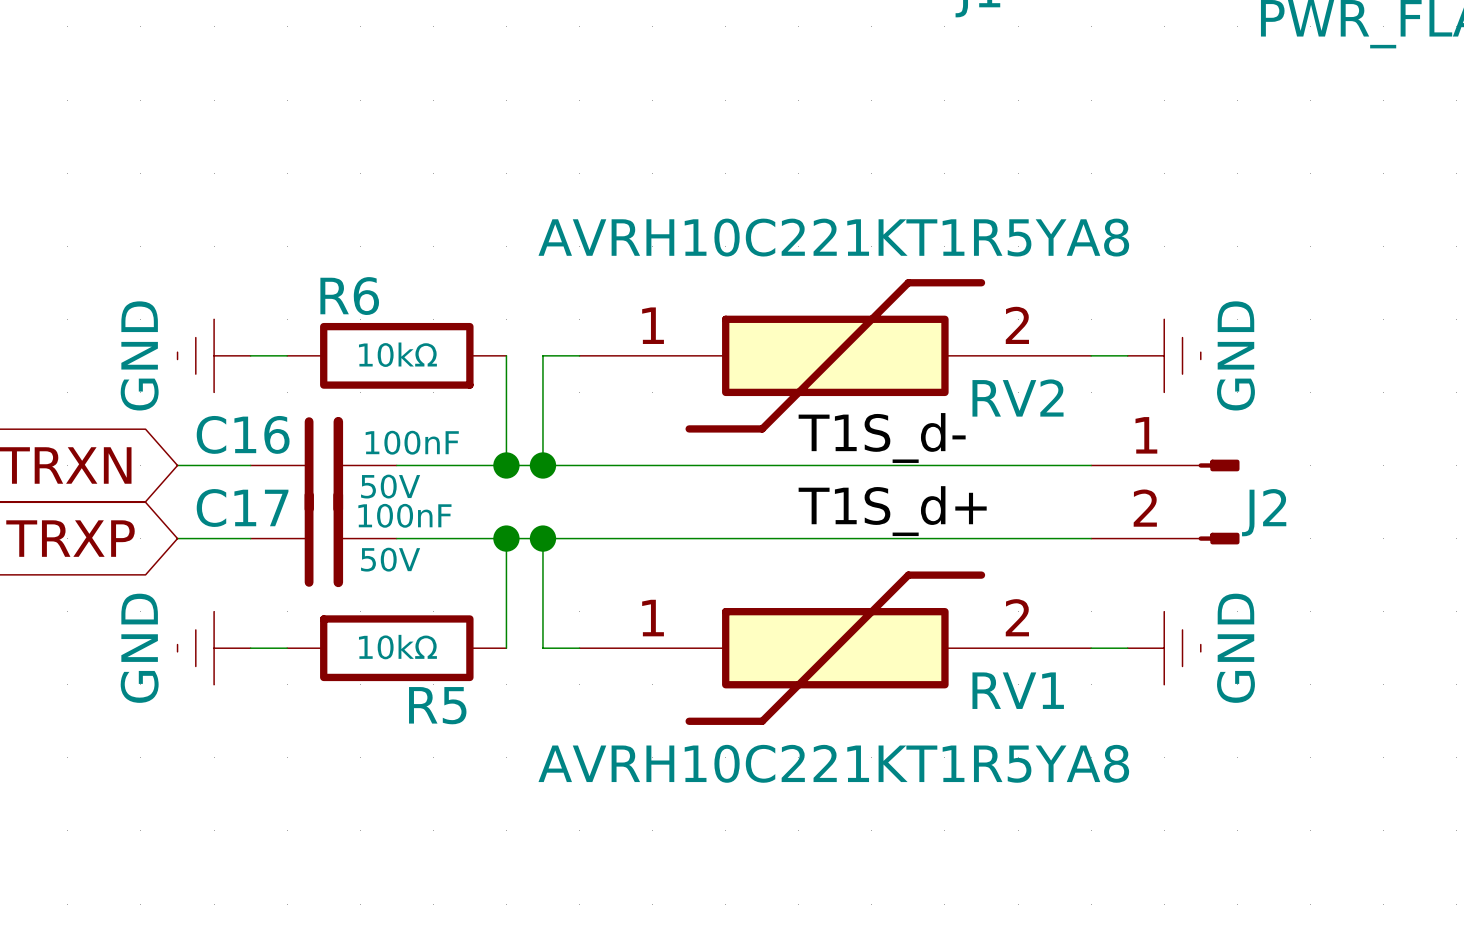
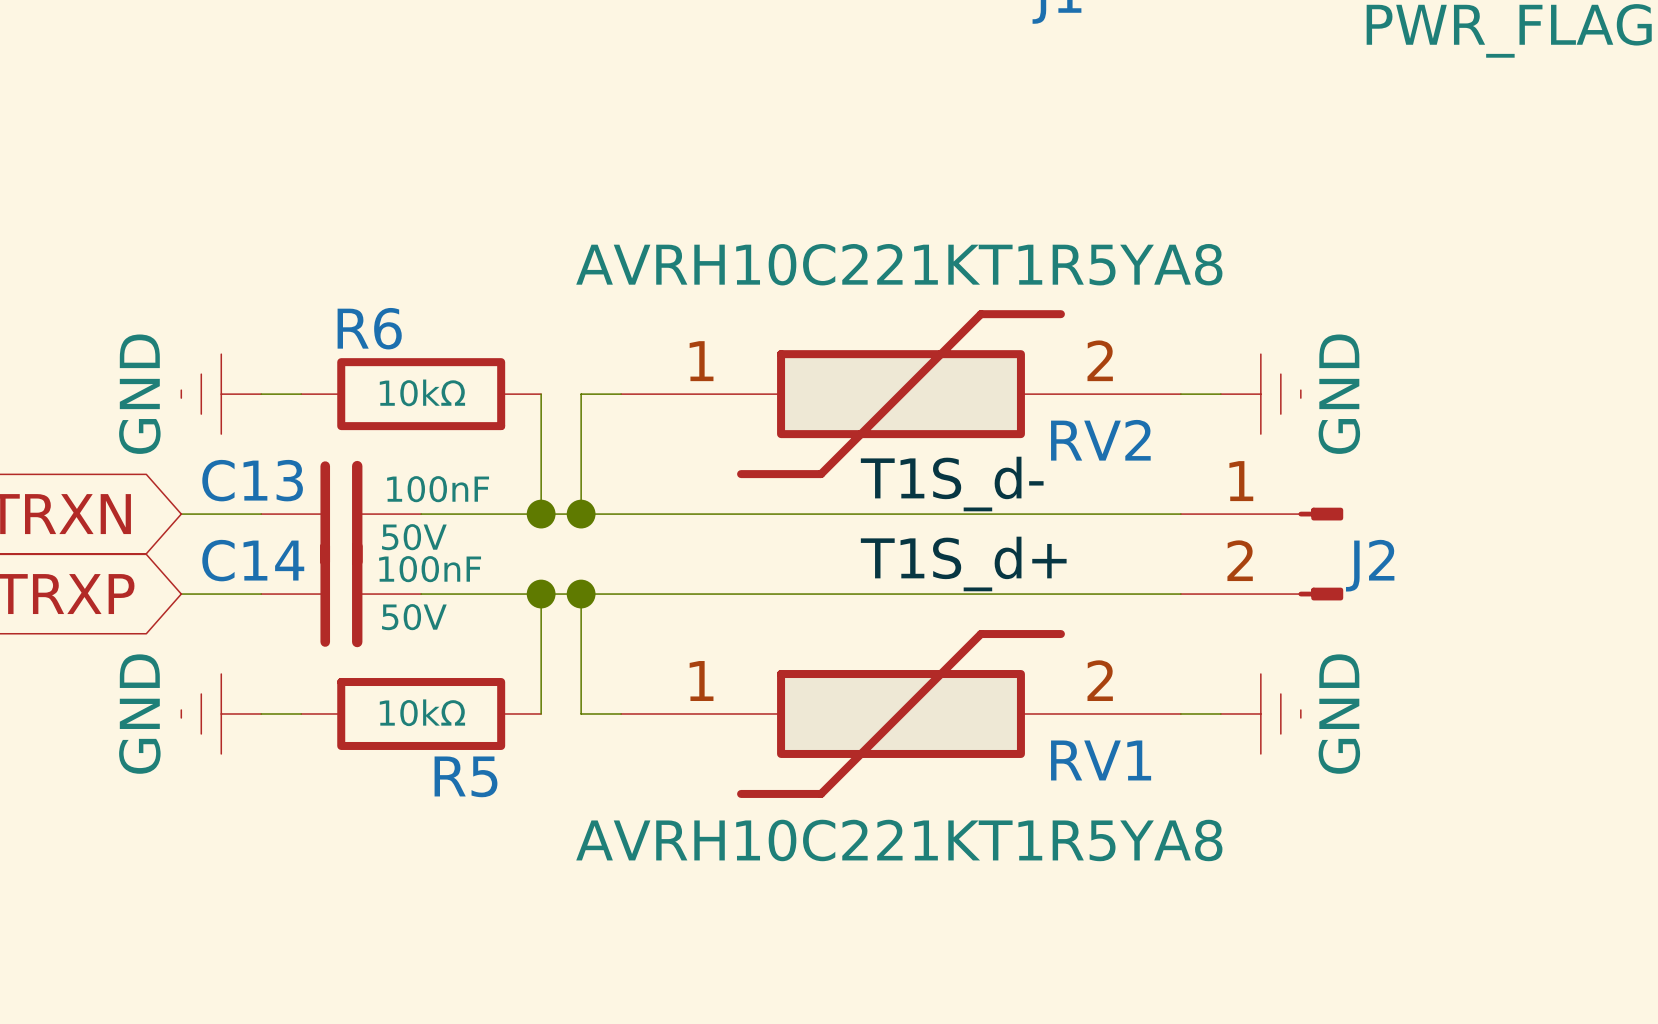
C16 name: C16 (243, 434) -> C13 (252, 480)
C17 name: C17 (242, 508) -> C14 (253, 560)

